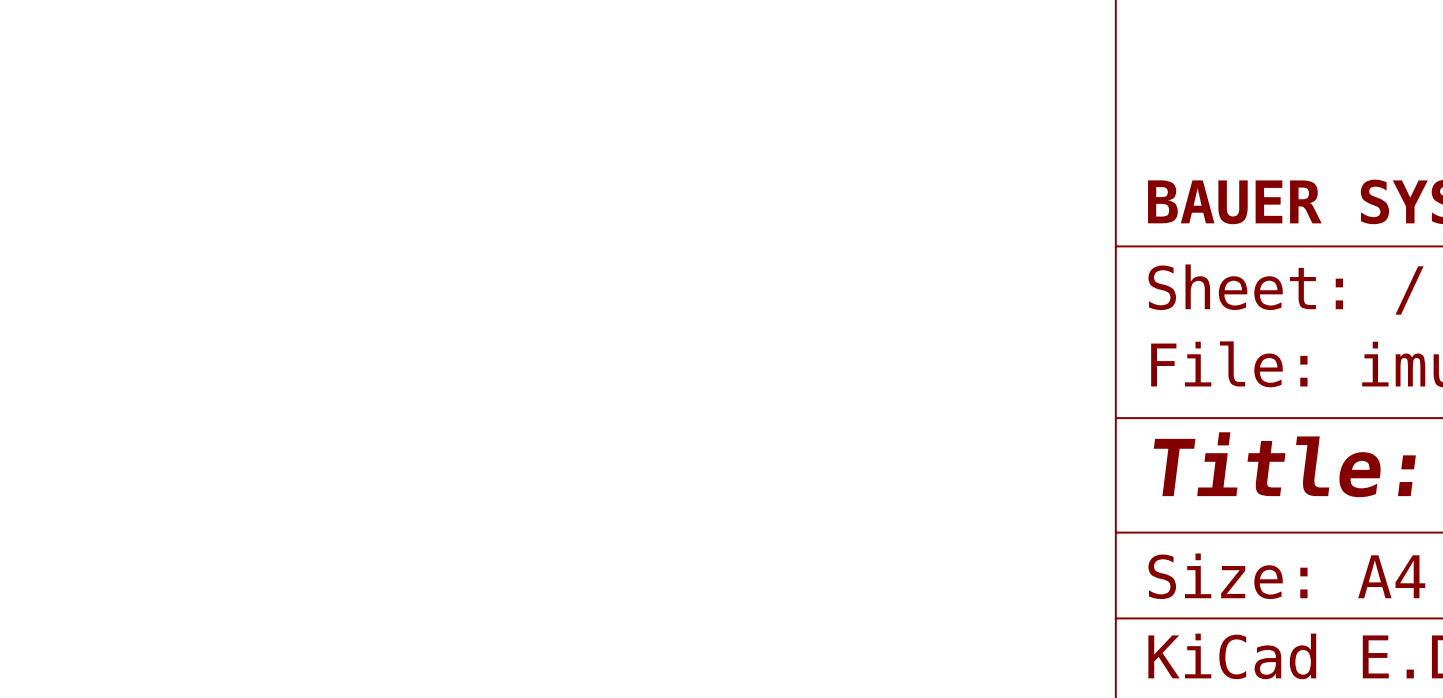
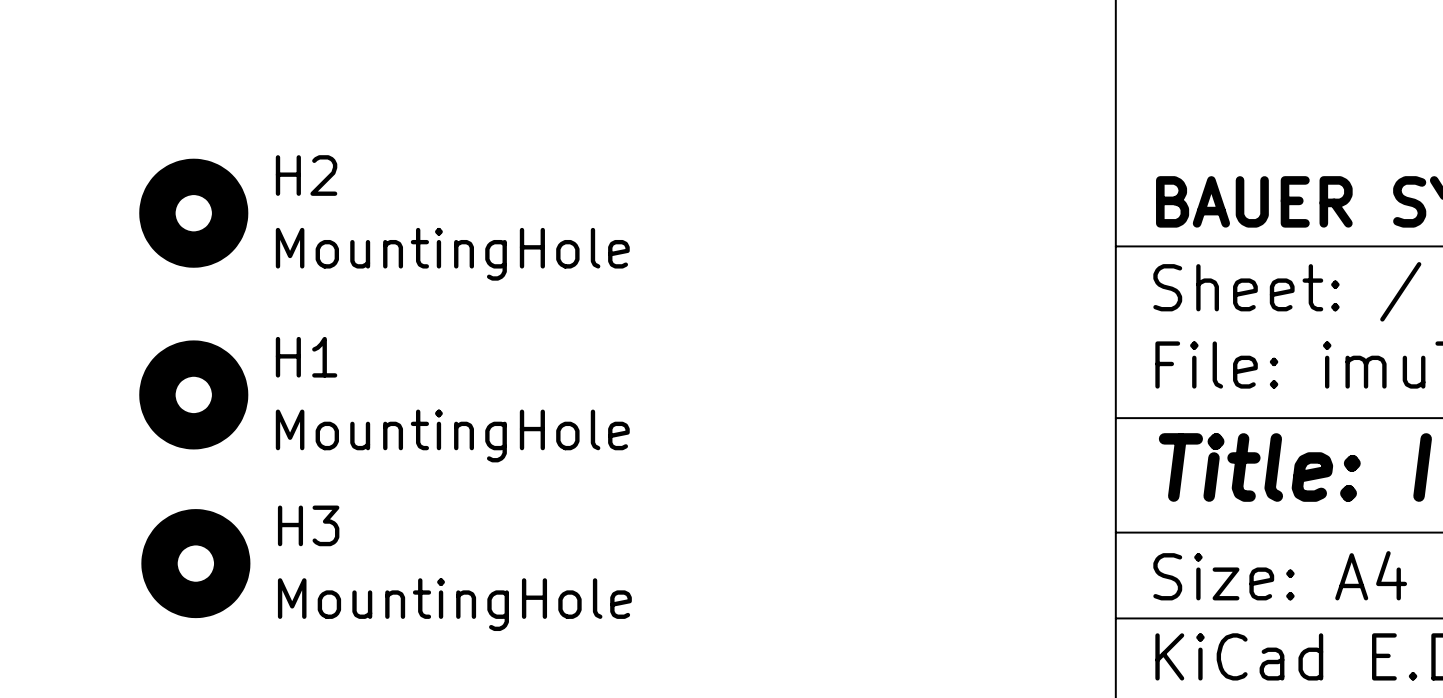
H2: none -> MountingHole (193, 213)
H1: none -> MountingHole (193, 394)
H3: none -> MountingHole (195, 563)

